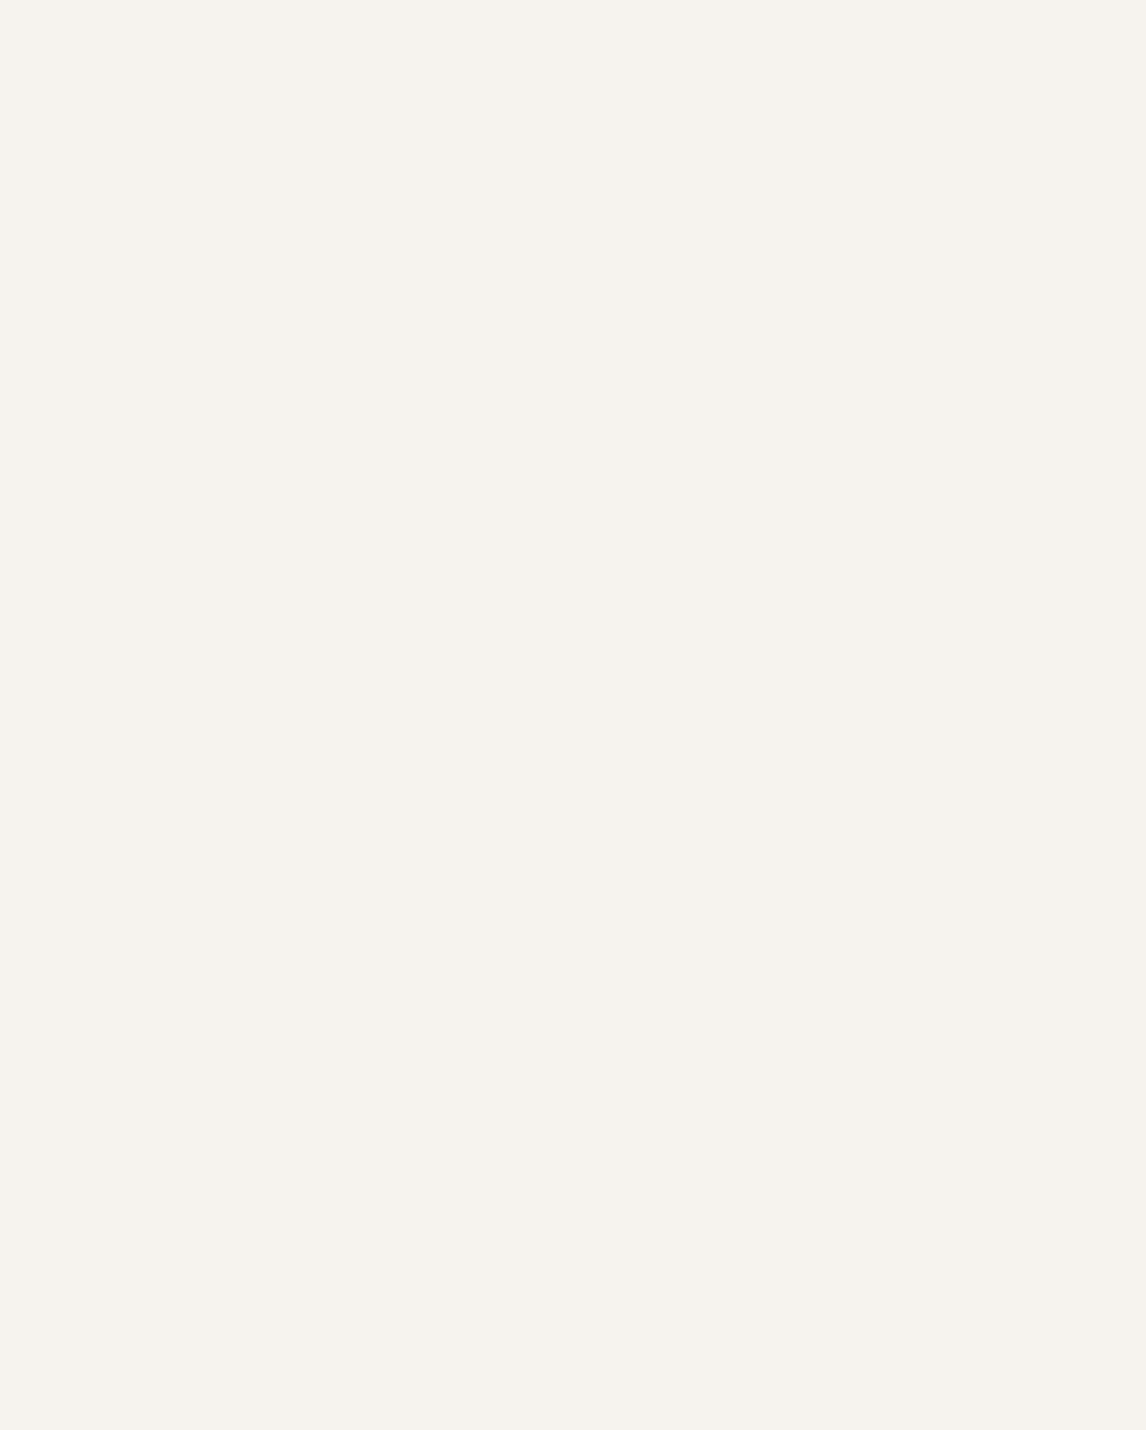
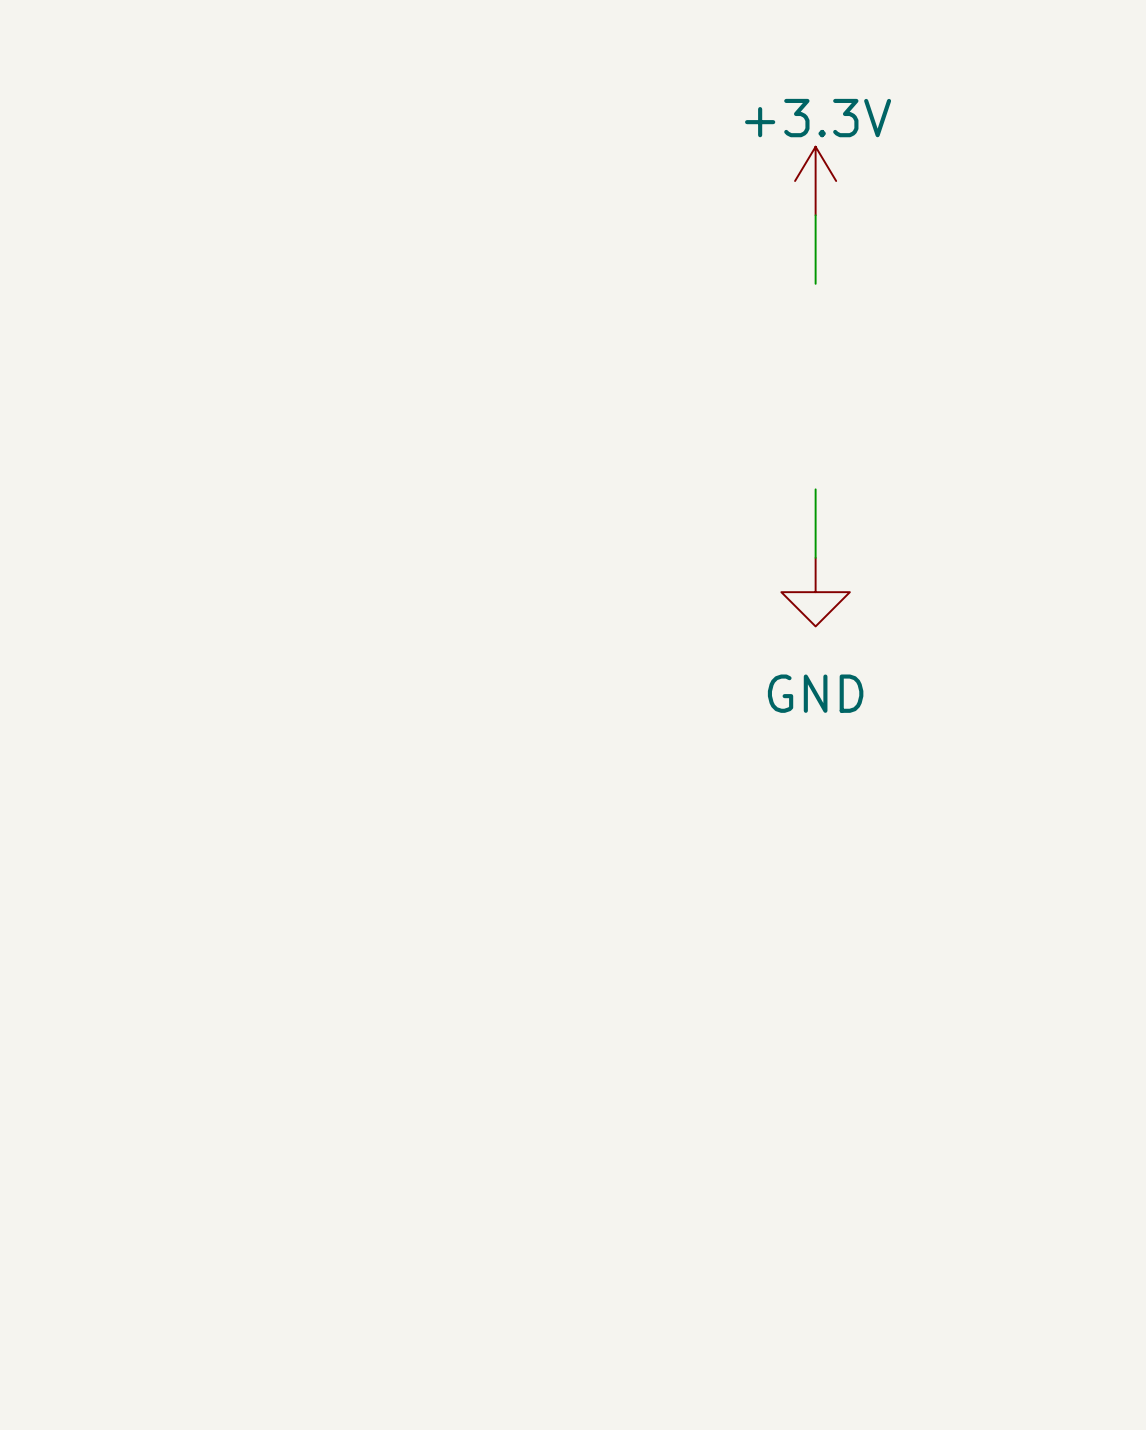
power symbol: none -> +3.3V (815, 181)
wire: none -> (815, 215) (815, 283)
wire: none -> (815, 489) (815, 557)
power symbol: none -> GND (815, 592)

